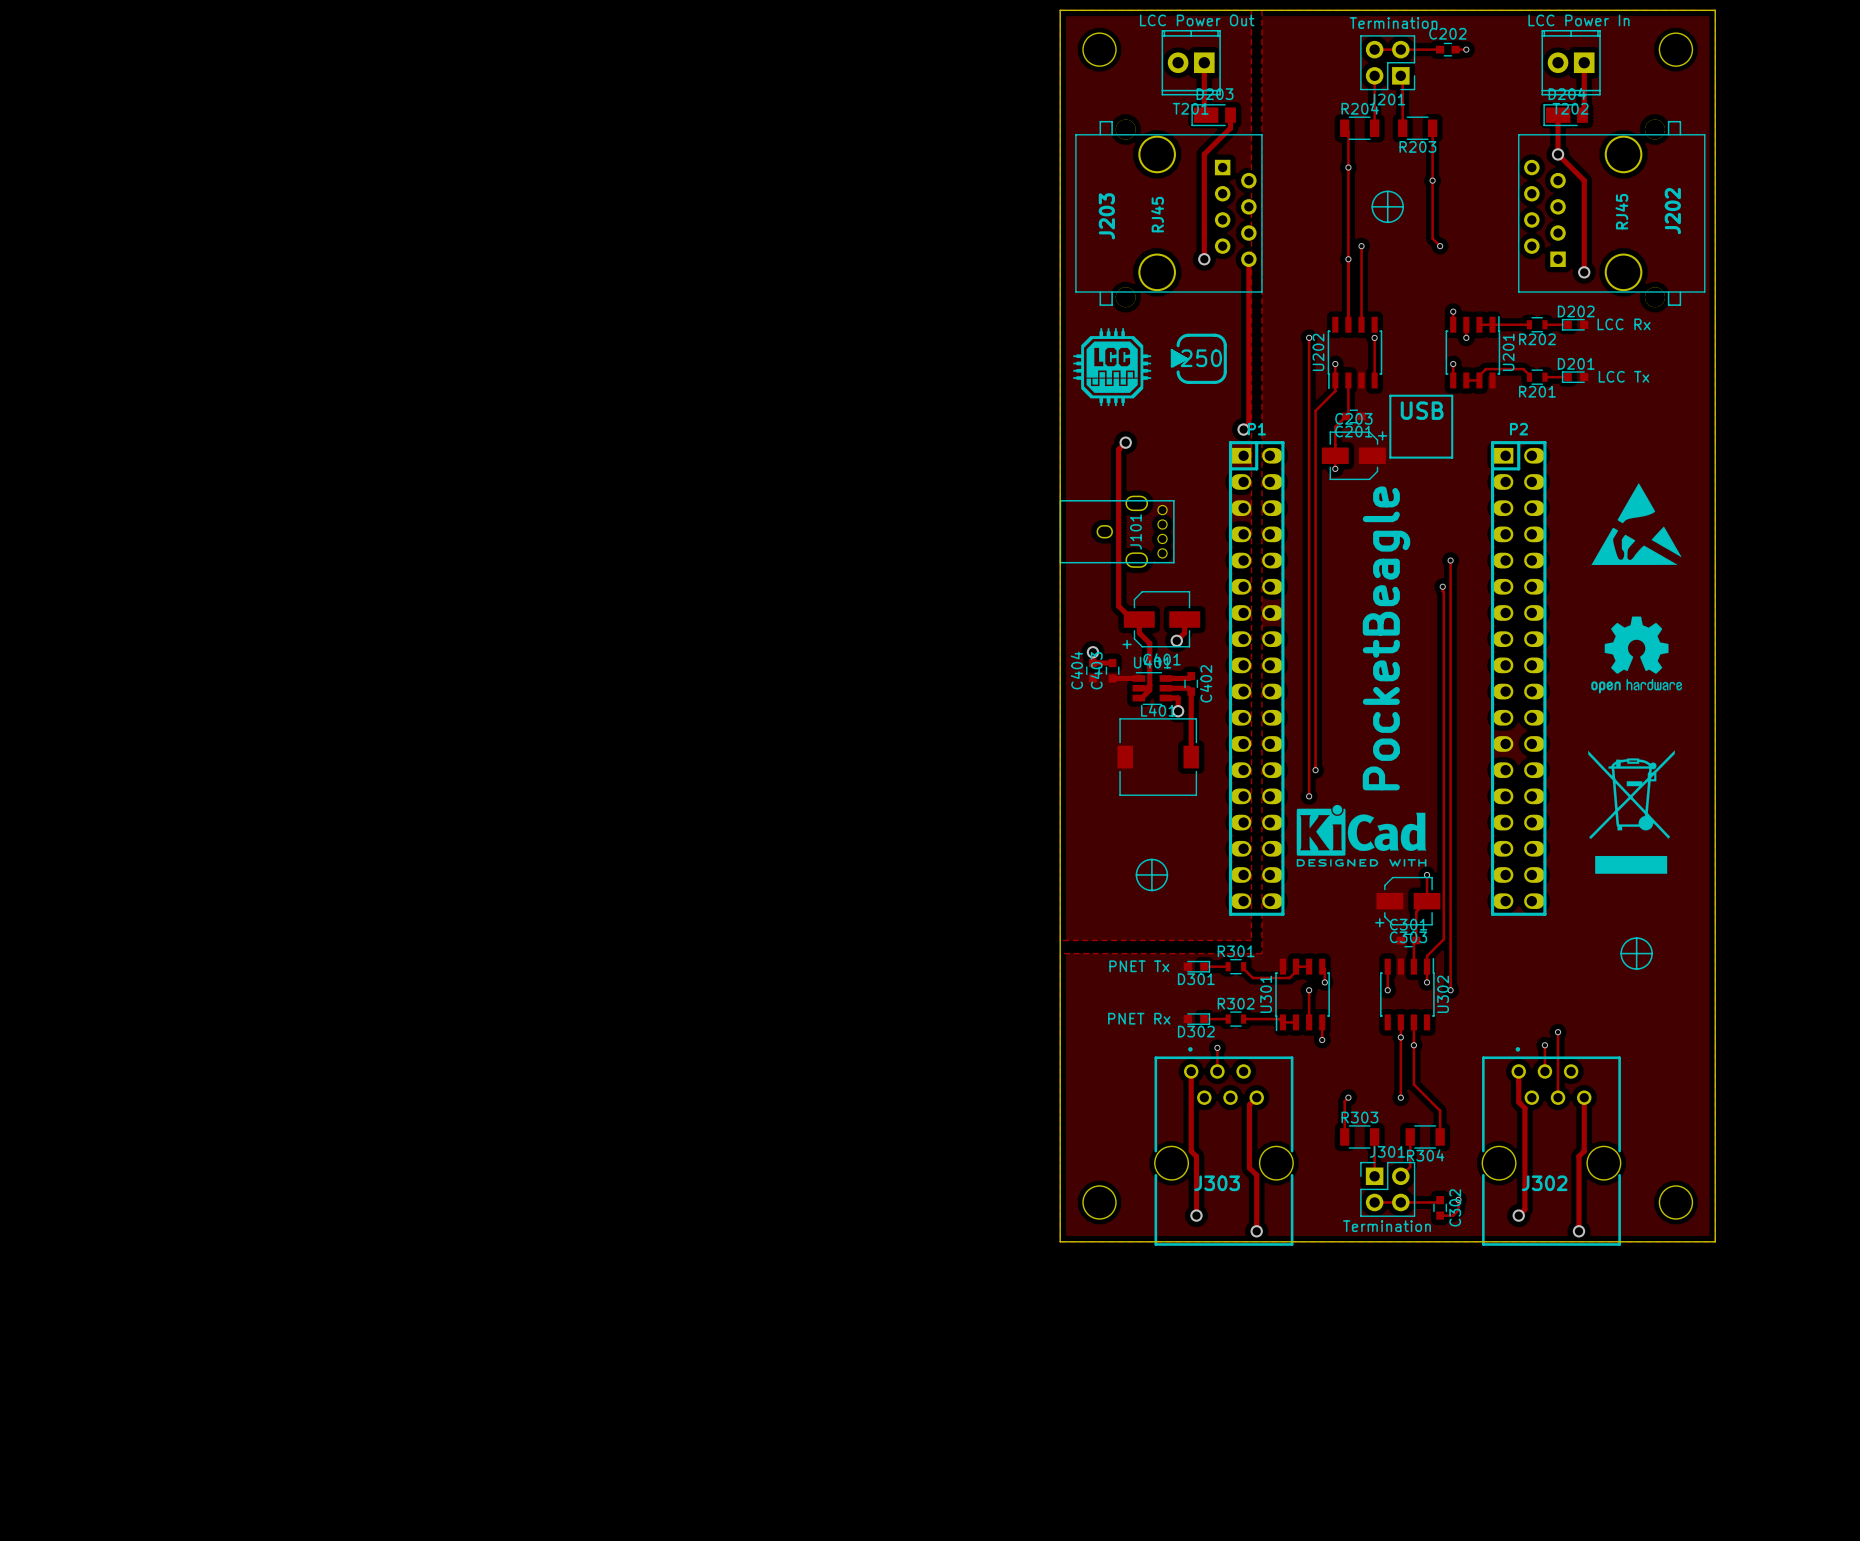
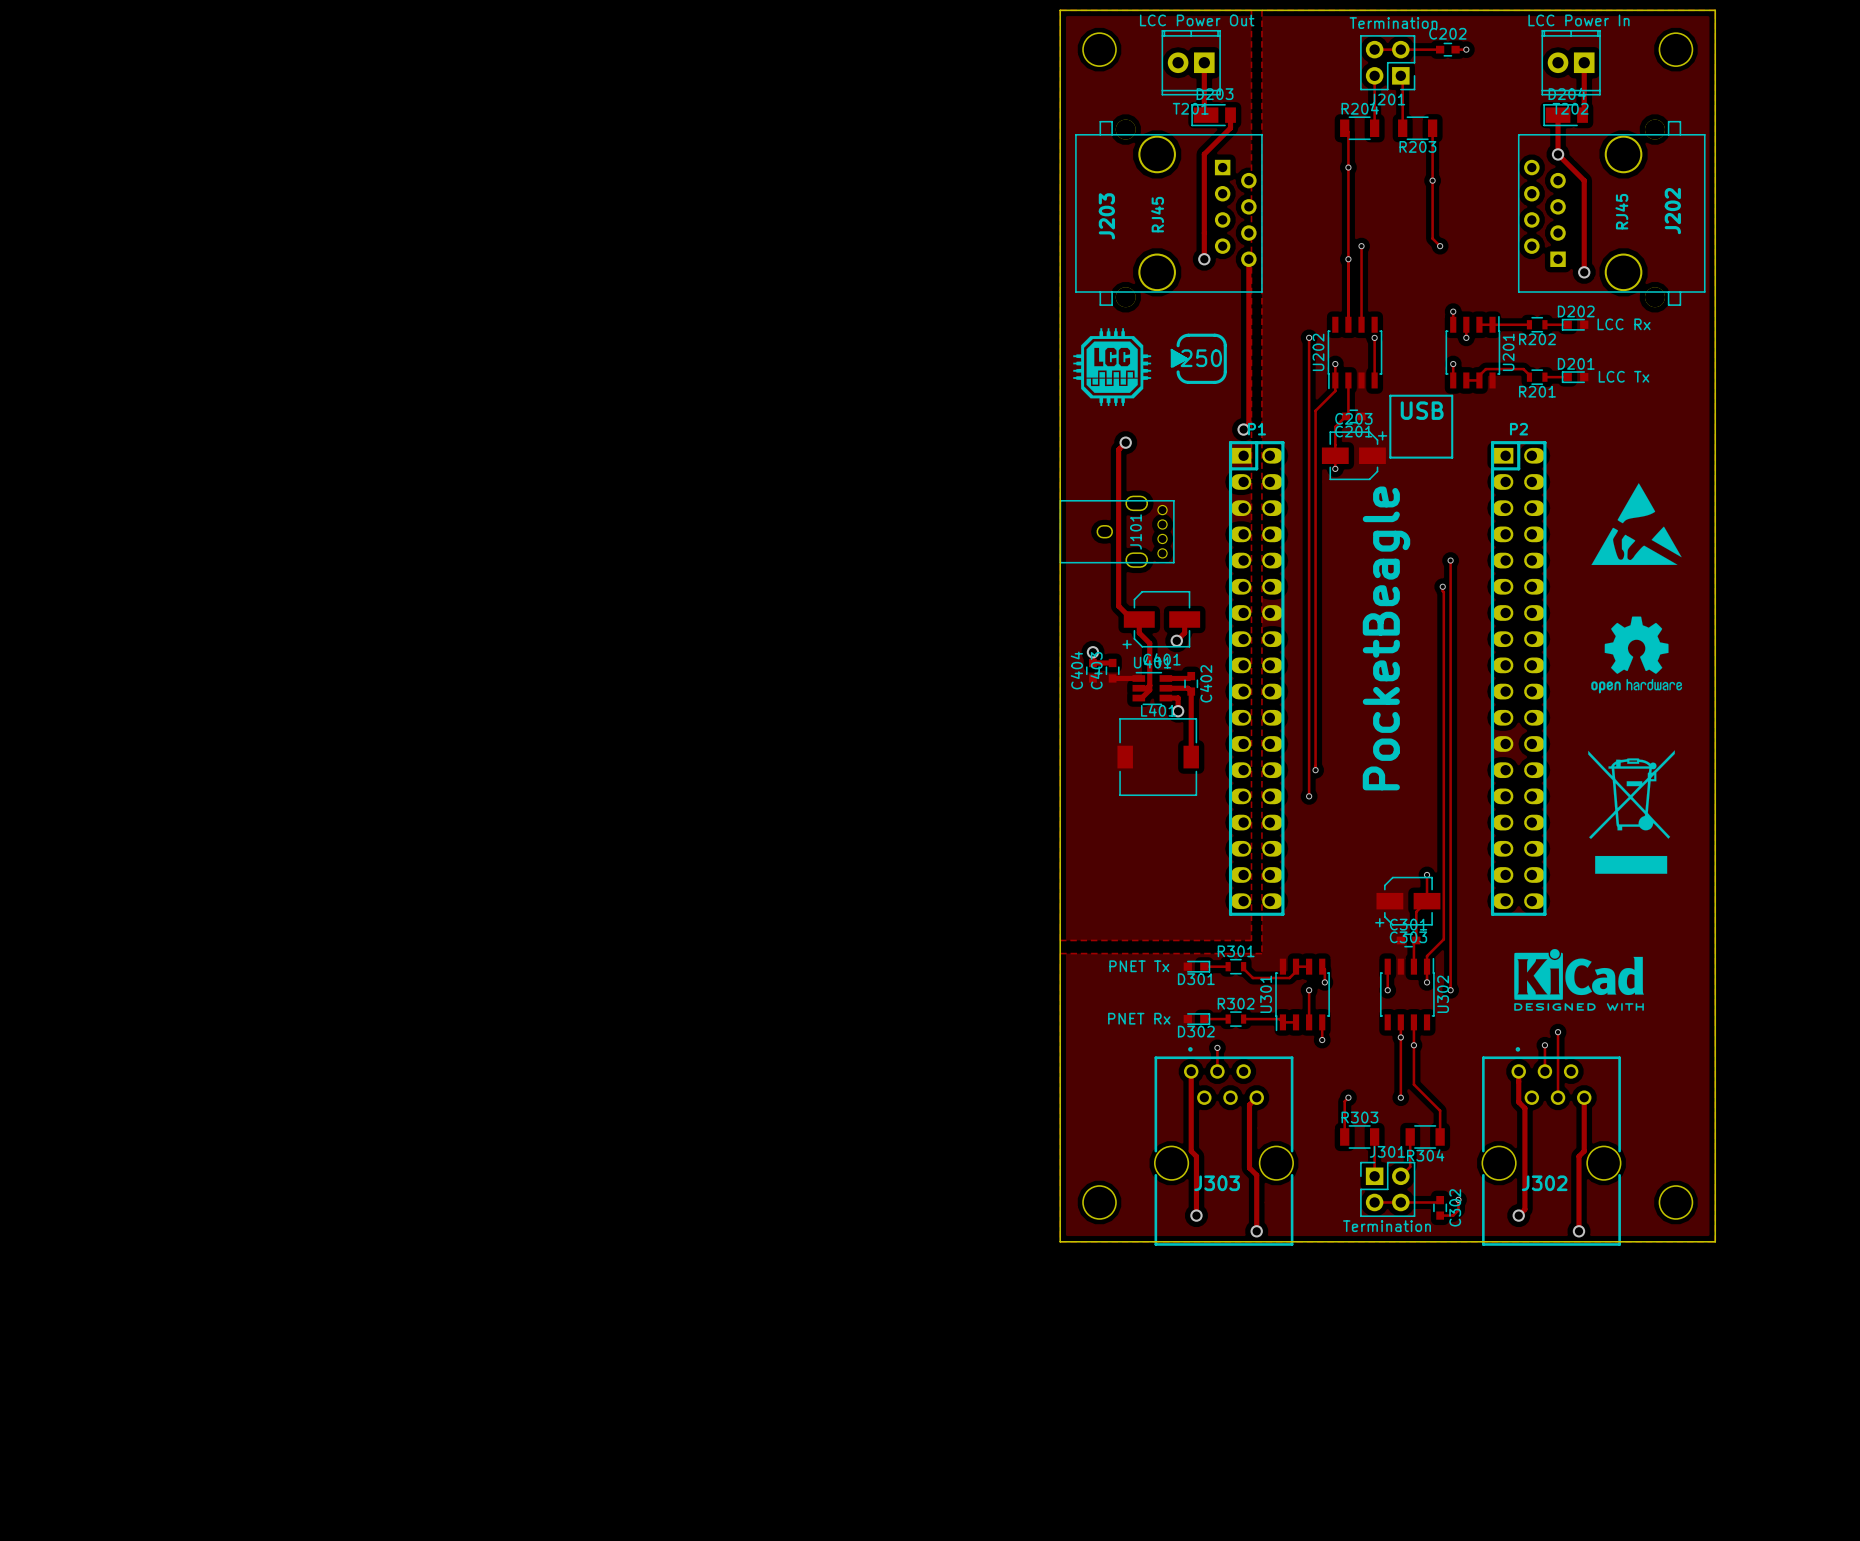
drawing: [1371, 190, 1404, 224] -> none
drawing: [1296, 804, 1427, 867] -> none
drawing: [1135, 858, 1169, 892] -> none
drawing: [1620, 937, 1653, 970] -> none
drawing: none -> [1514, 949, 1644, 1011]

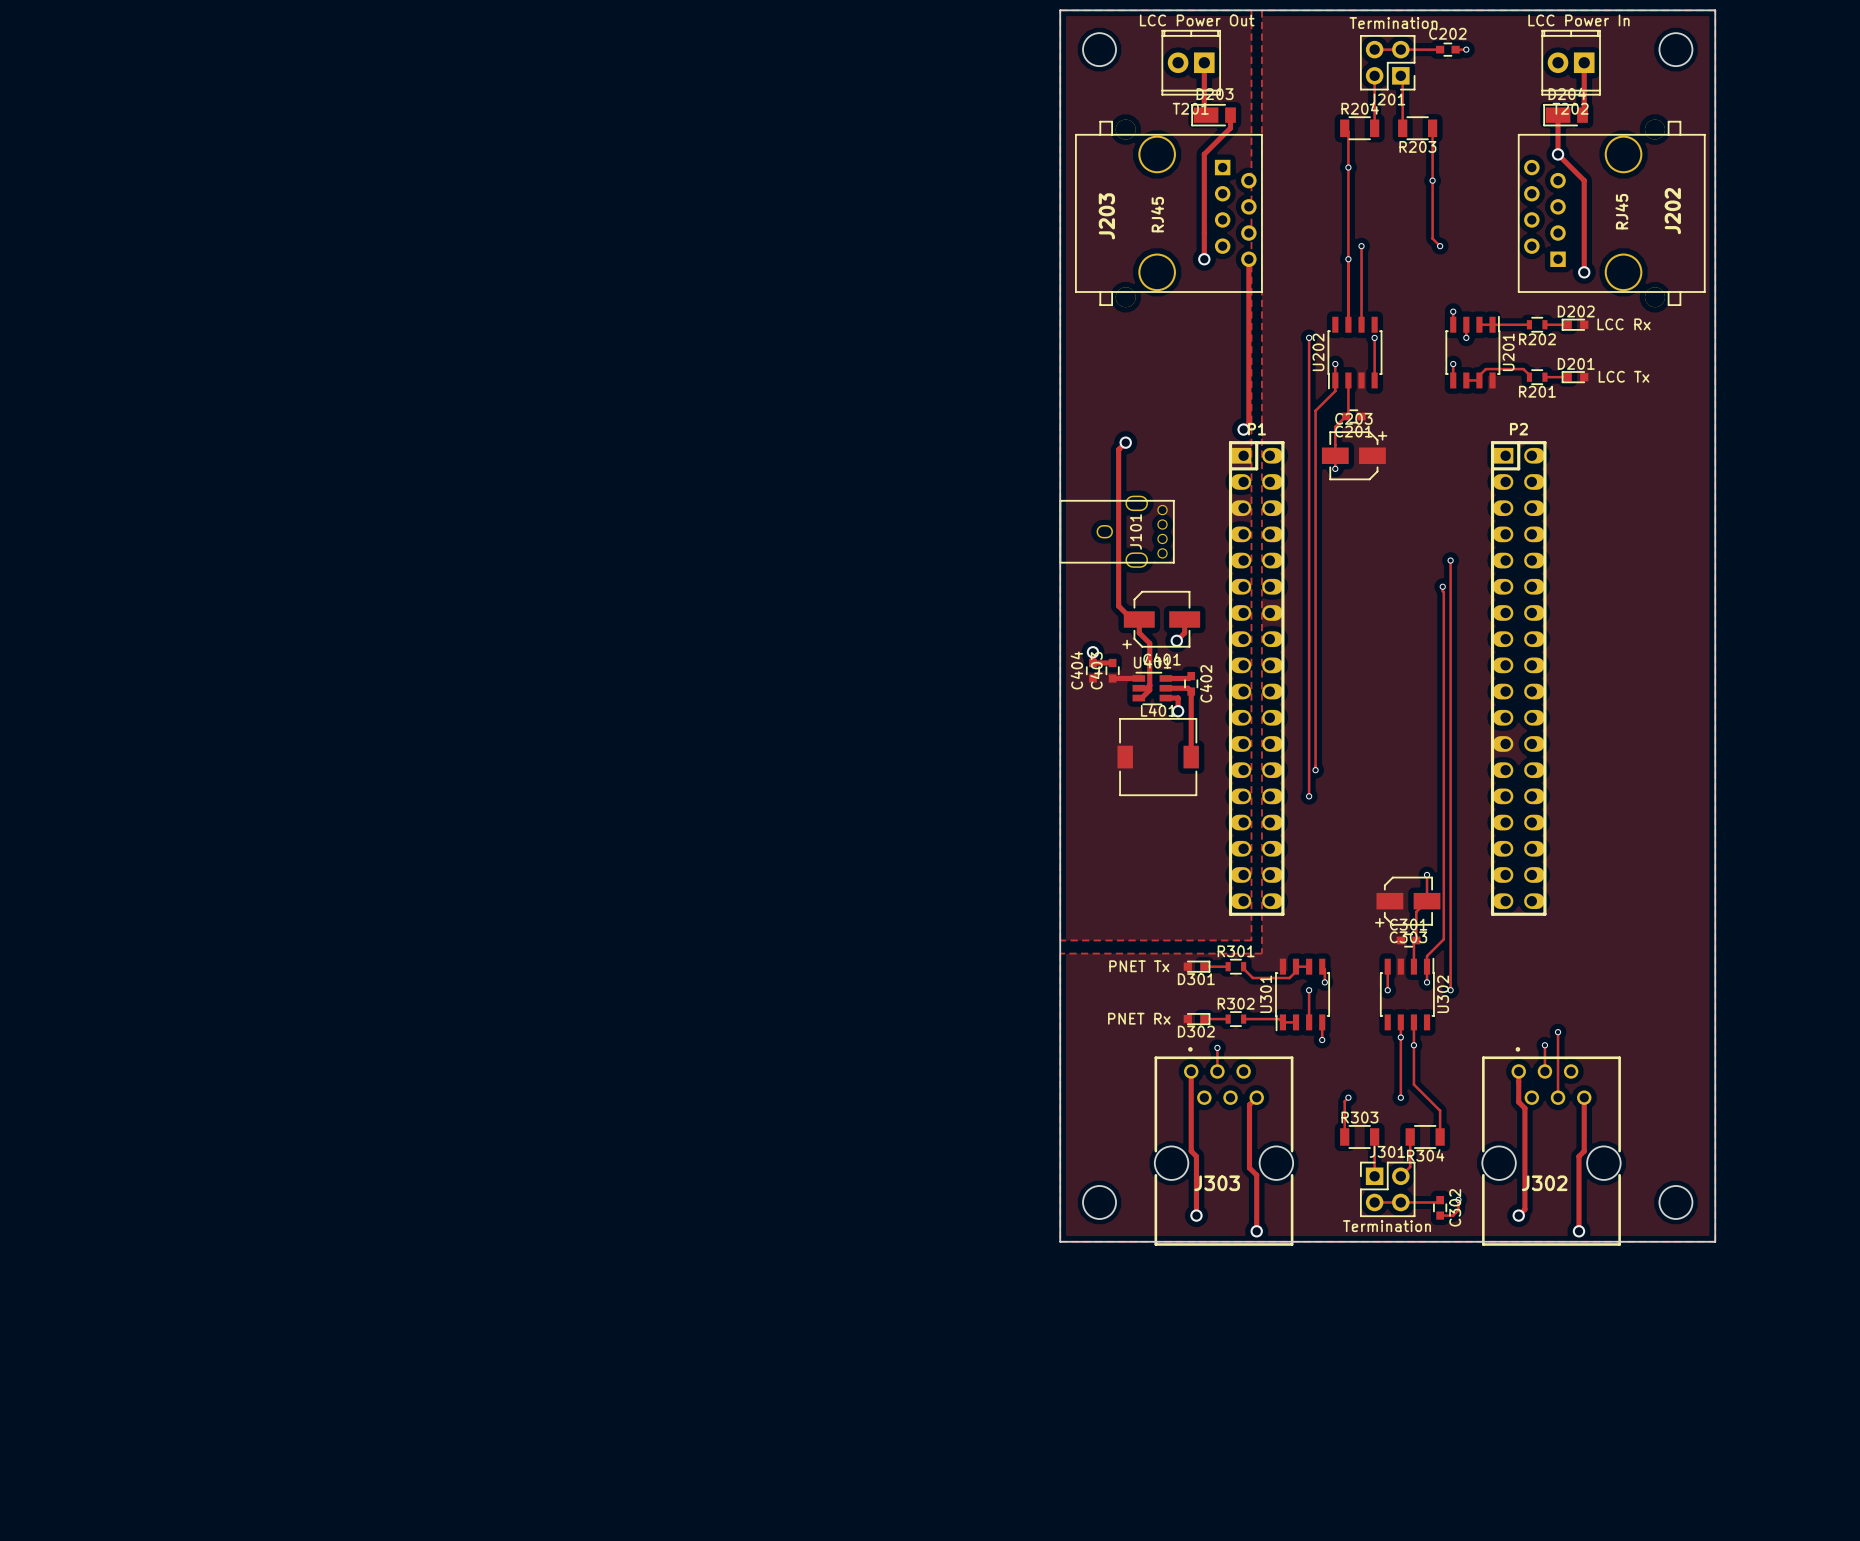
drawing: [1073, 328, 1152, 407] -> none
drawing: [1170, 333, 1227, 384] -> none
line: (1390, 395) (1452, 395) (1452, 457) (1390, 457) (1390, 395) -> none
text: USB (1422, 410) -> none
drawing: [1591, 483, 1682, 566] -> none
drawing: [1591, 616, 1683, 694] -> none
text: PocketBeagle (1386, 638) -> none
drawing: [1588, 750, 1675, 874] -> none
drawing: [1514, 949, 1644, 1011] -> none

